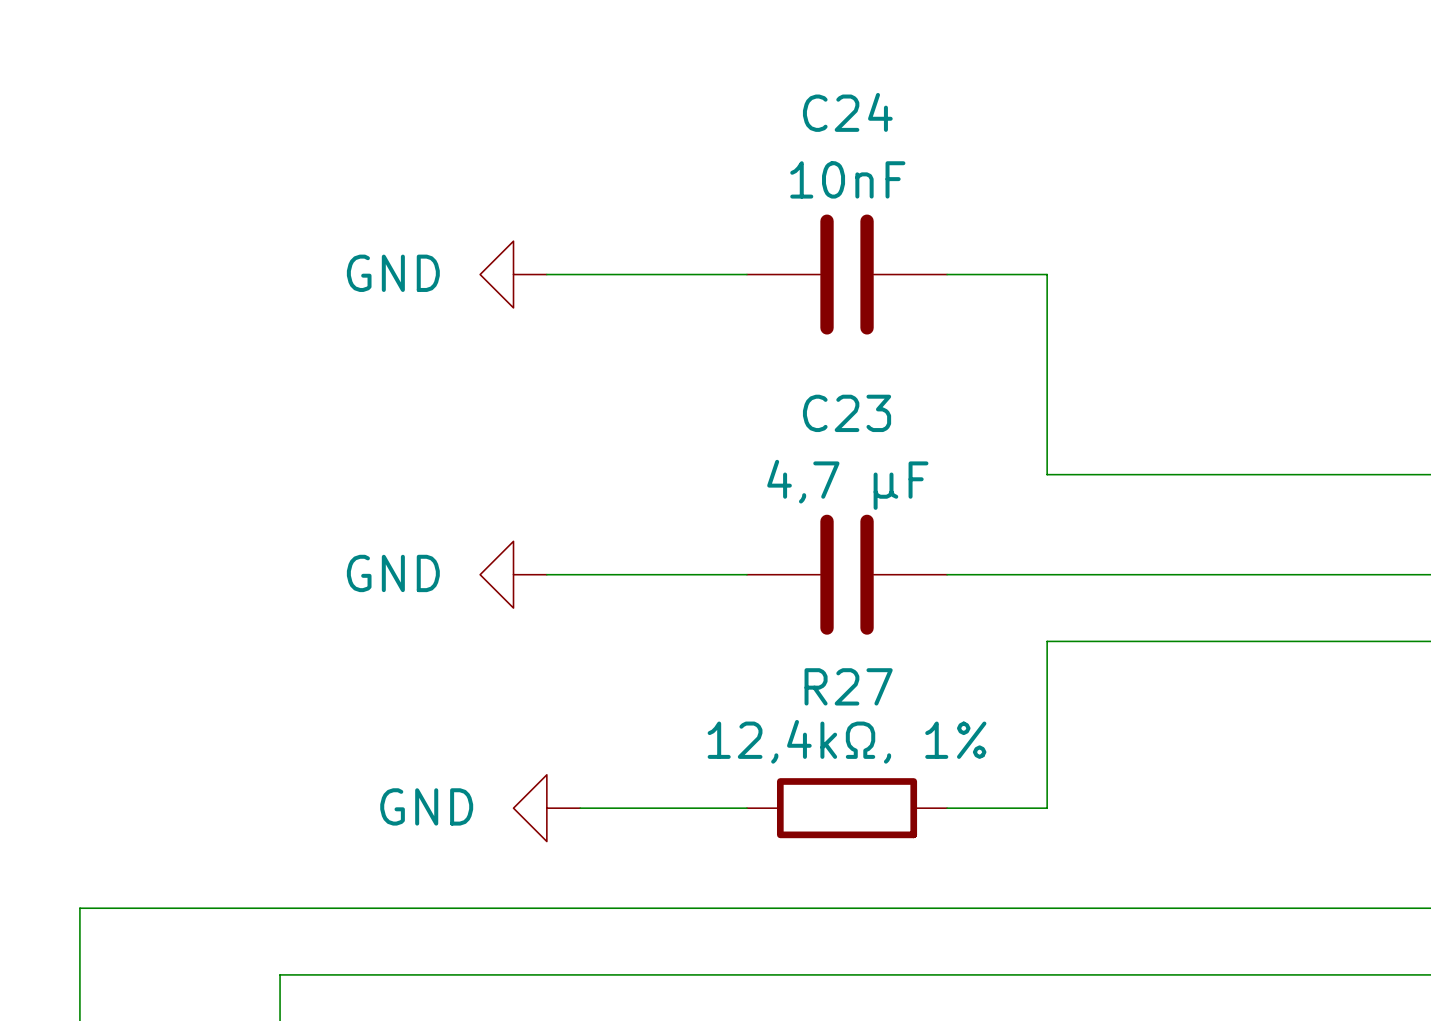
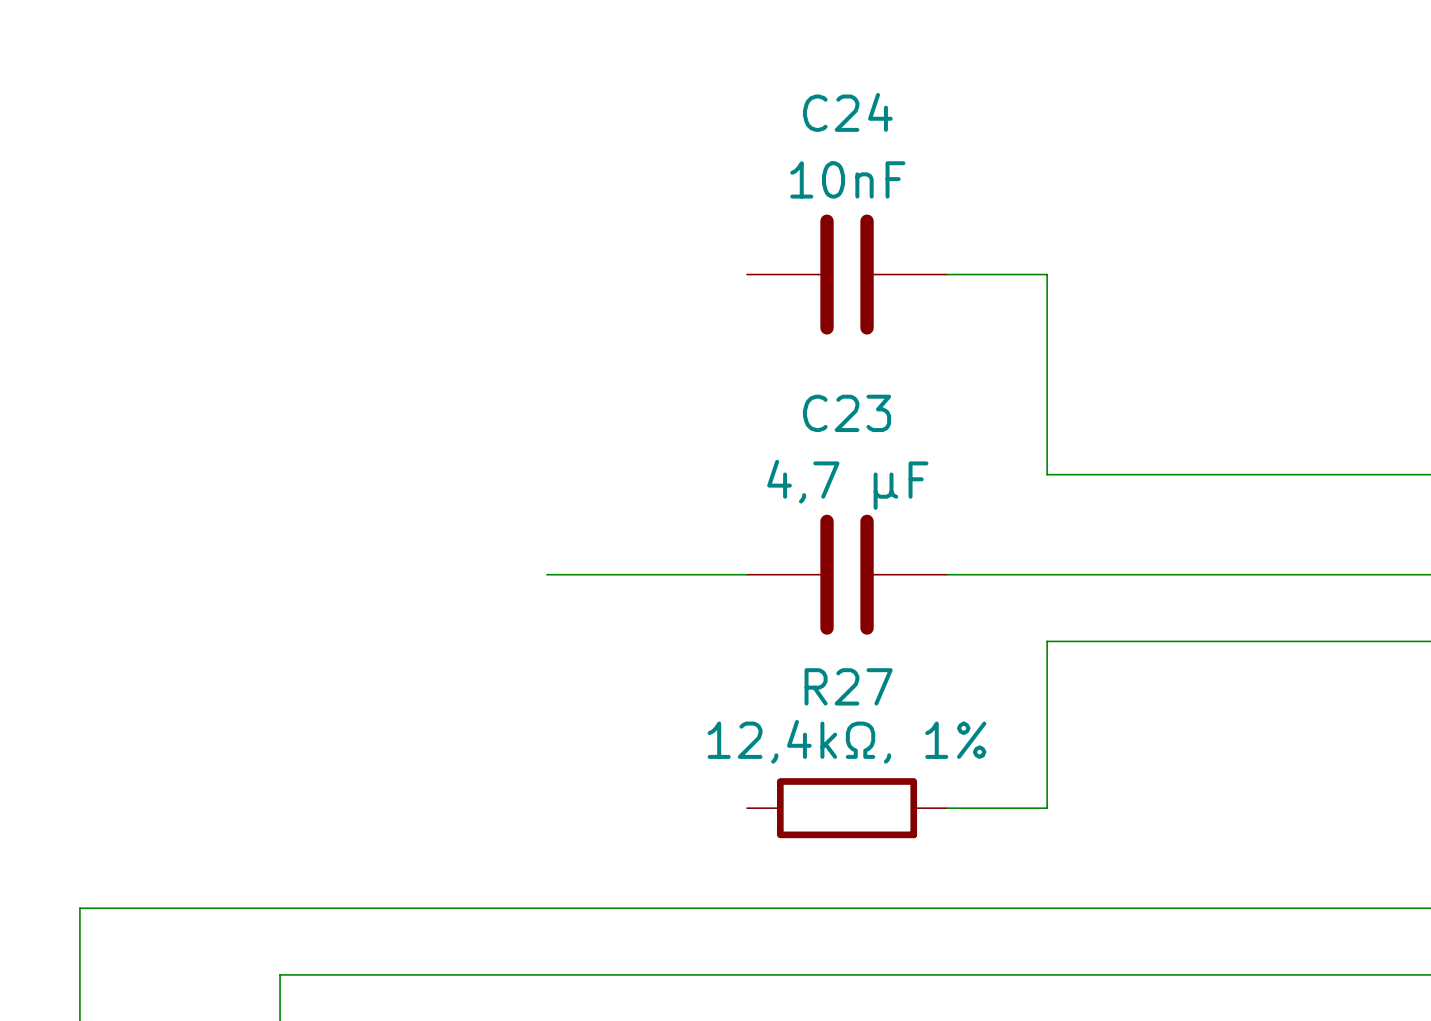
power symbol: GND (513, 274) -> none
wire: (546, 274) (746, 274) -> none
power symbol: GND (513, 574) -> none
power symbol: GND (546, 808) -> none
wire: (580, 808) (746, 808) -> none

